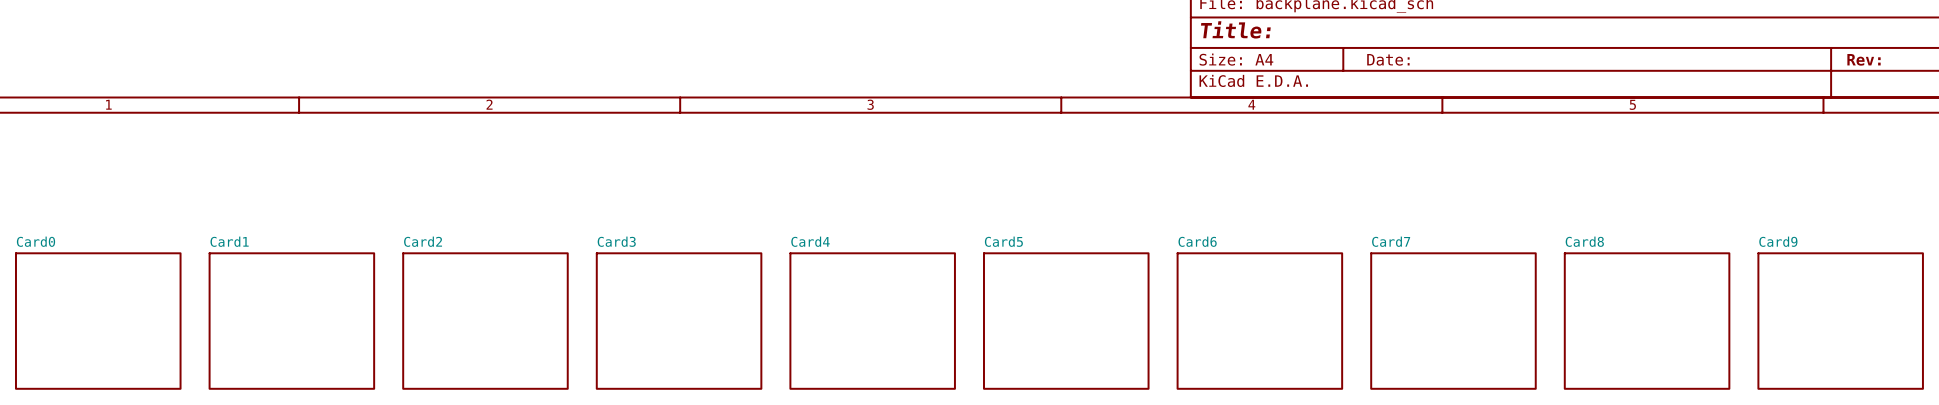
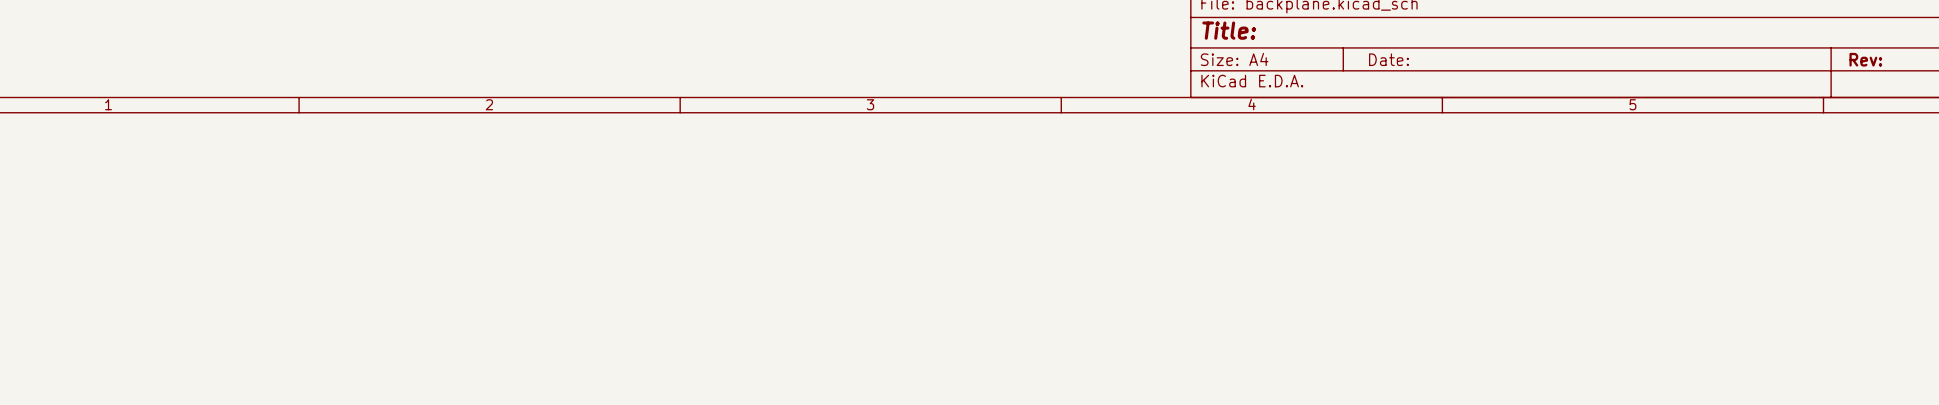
sheet Card0: (98, 321) -> none
sheet Card1: (291, 321) -> none
sheet Card2: (485, 321) -> none
sheet Card3: (679, 321) -> none
sheet Card4: (872, 321) -> none
sheet Card5: (1066, 321) -> none
sheet Card6: (1259, 321) -> none
sheet Card7: (1453, 321) -> none
sheet Card8: (1647, 321) -> none
sheet Card9: (1840, 321) -> none

